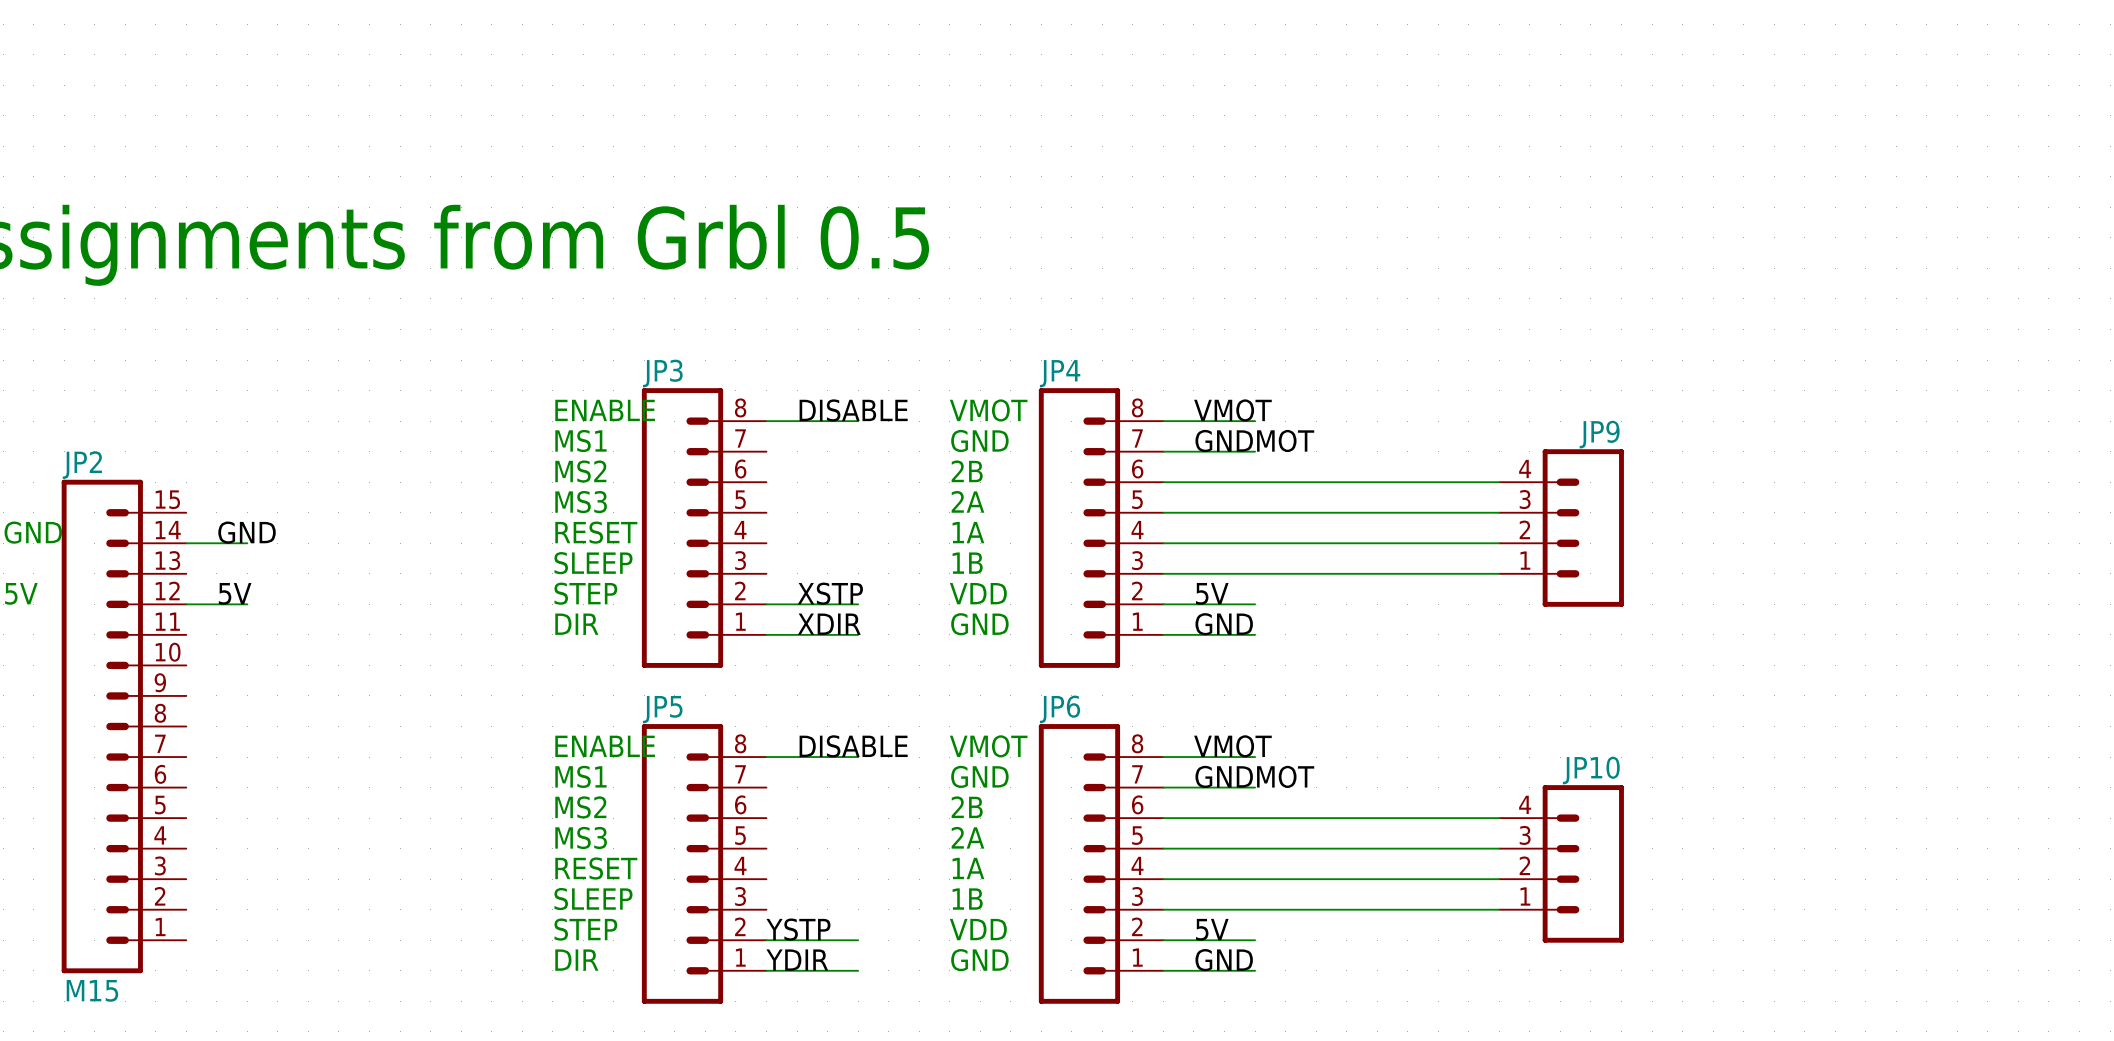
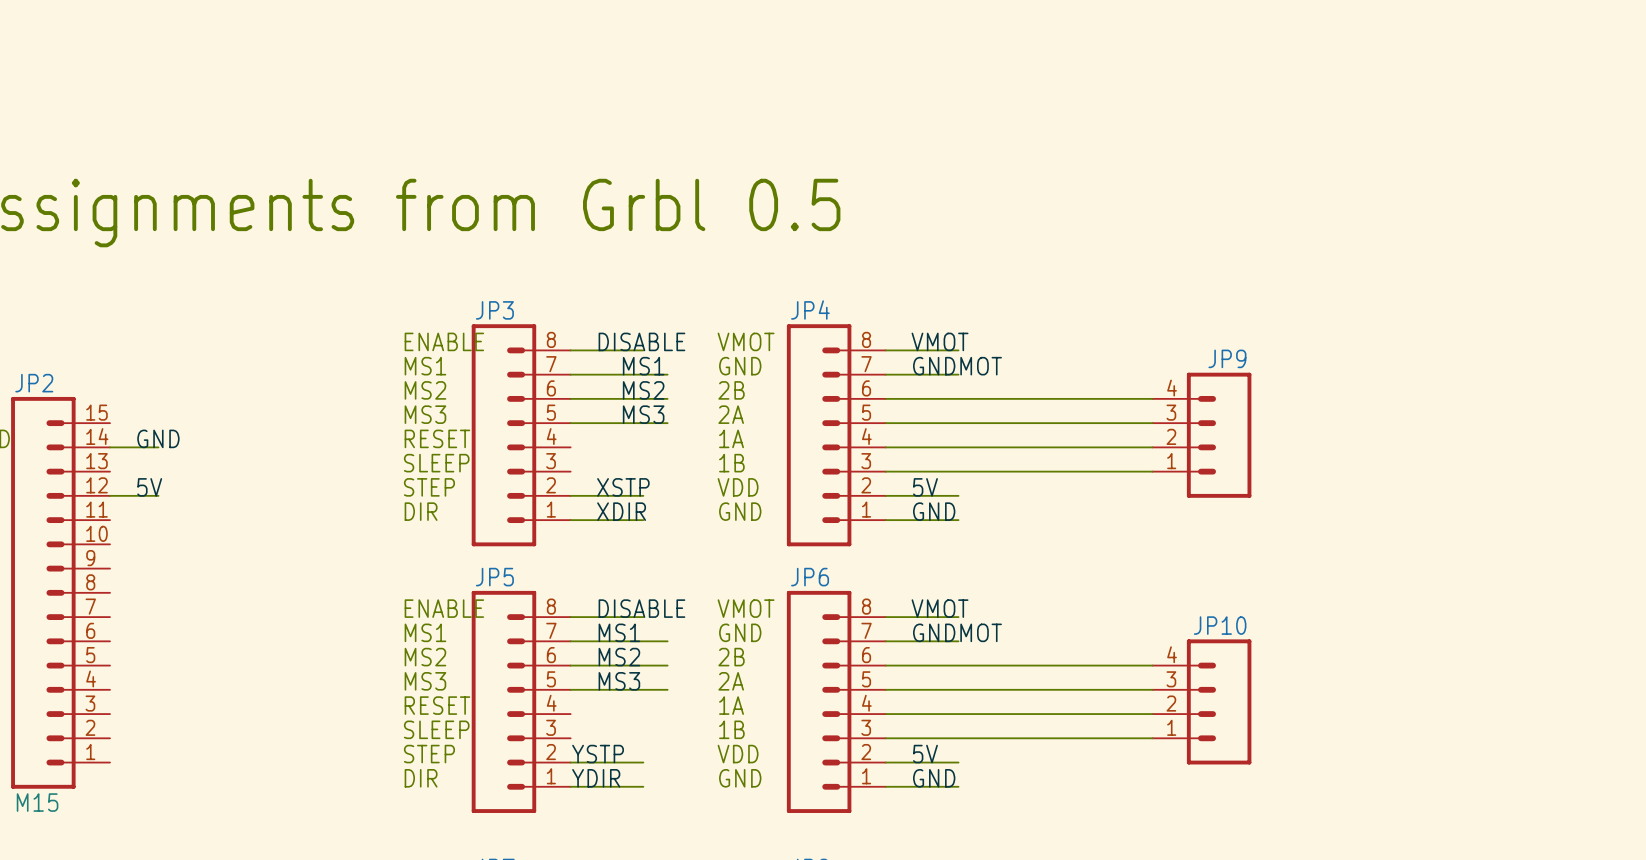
label: none -> MS1 (643, 366)
wire: none -> (570, 374) (667, 374)
label: none -> MS2 (643, 390)
wire: none -> (570, 398) (667, 398)
label: none -> MS3 (643, 414)
wire: none -> (570, 423) (667, 423)
label: none -> MS1 (619, 632)
wire: none -> (570, 641) (667, 641)
label: none -> MS2 (619, 657)
wire: none -> (570, 665) (667, 665)
label: none -> MS3 (619, 681)
wire: none -> (570, 689) (667, 689)

